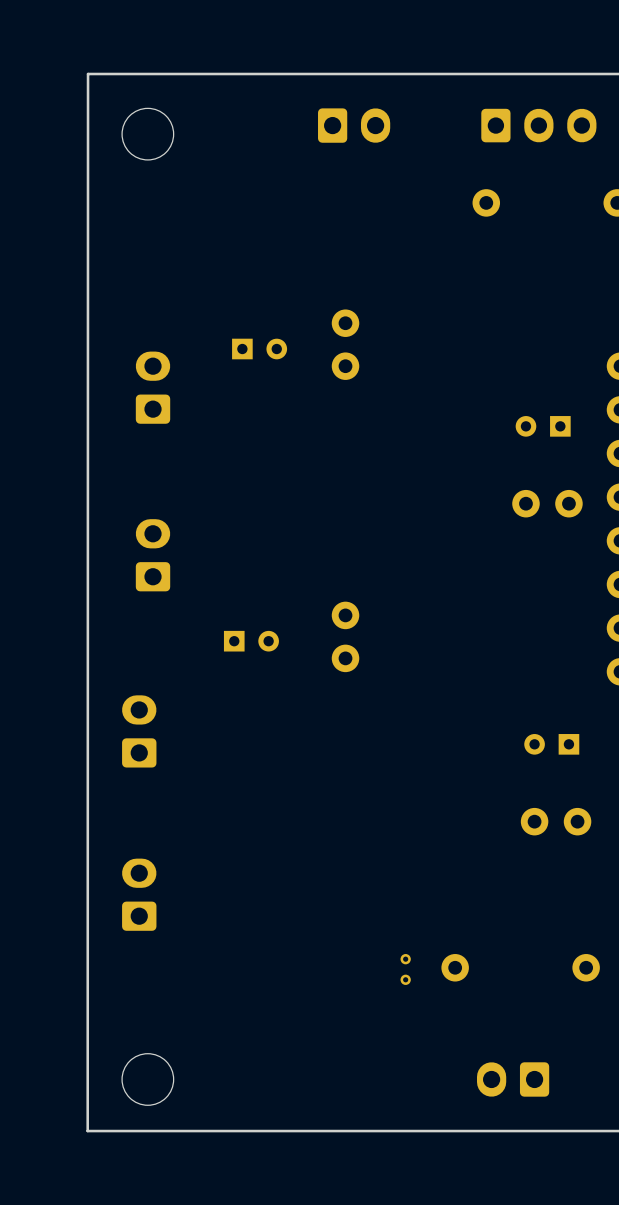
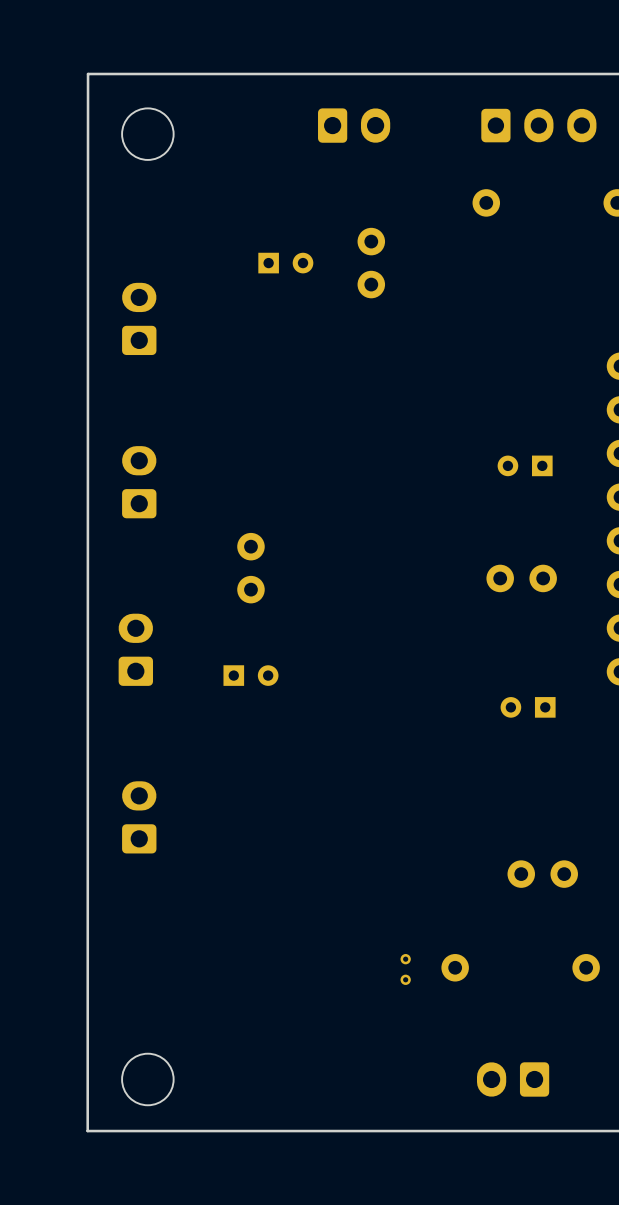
part: none -> (139, 318)
part position: (345, 344) -> (371, 263)
part position: (259, 349) -> (285, 263)
part: (153, 387) -> none
part position: (543, 426) -> (525, 465)
part: none -> (139, 482)
part position: (547, 503) -> (521, 578)
part: (153, 555) -> none
part: none -> (250, 568)
part: (345, 636) -> none
part position: (251, 641) -> (250, 675)
part: none -> (135, 649)
part: (139, 731) -> none
part position: (551, 744) -> (528, 707)
part: none -> (139, 817)
part position: (556, 821) -> (542, 874)
part: (139, 894) -> none

